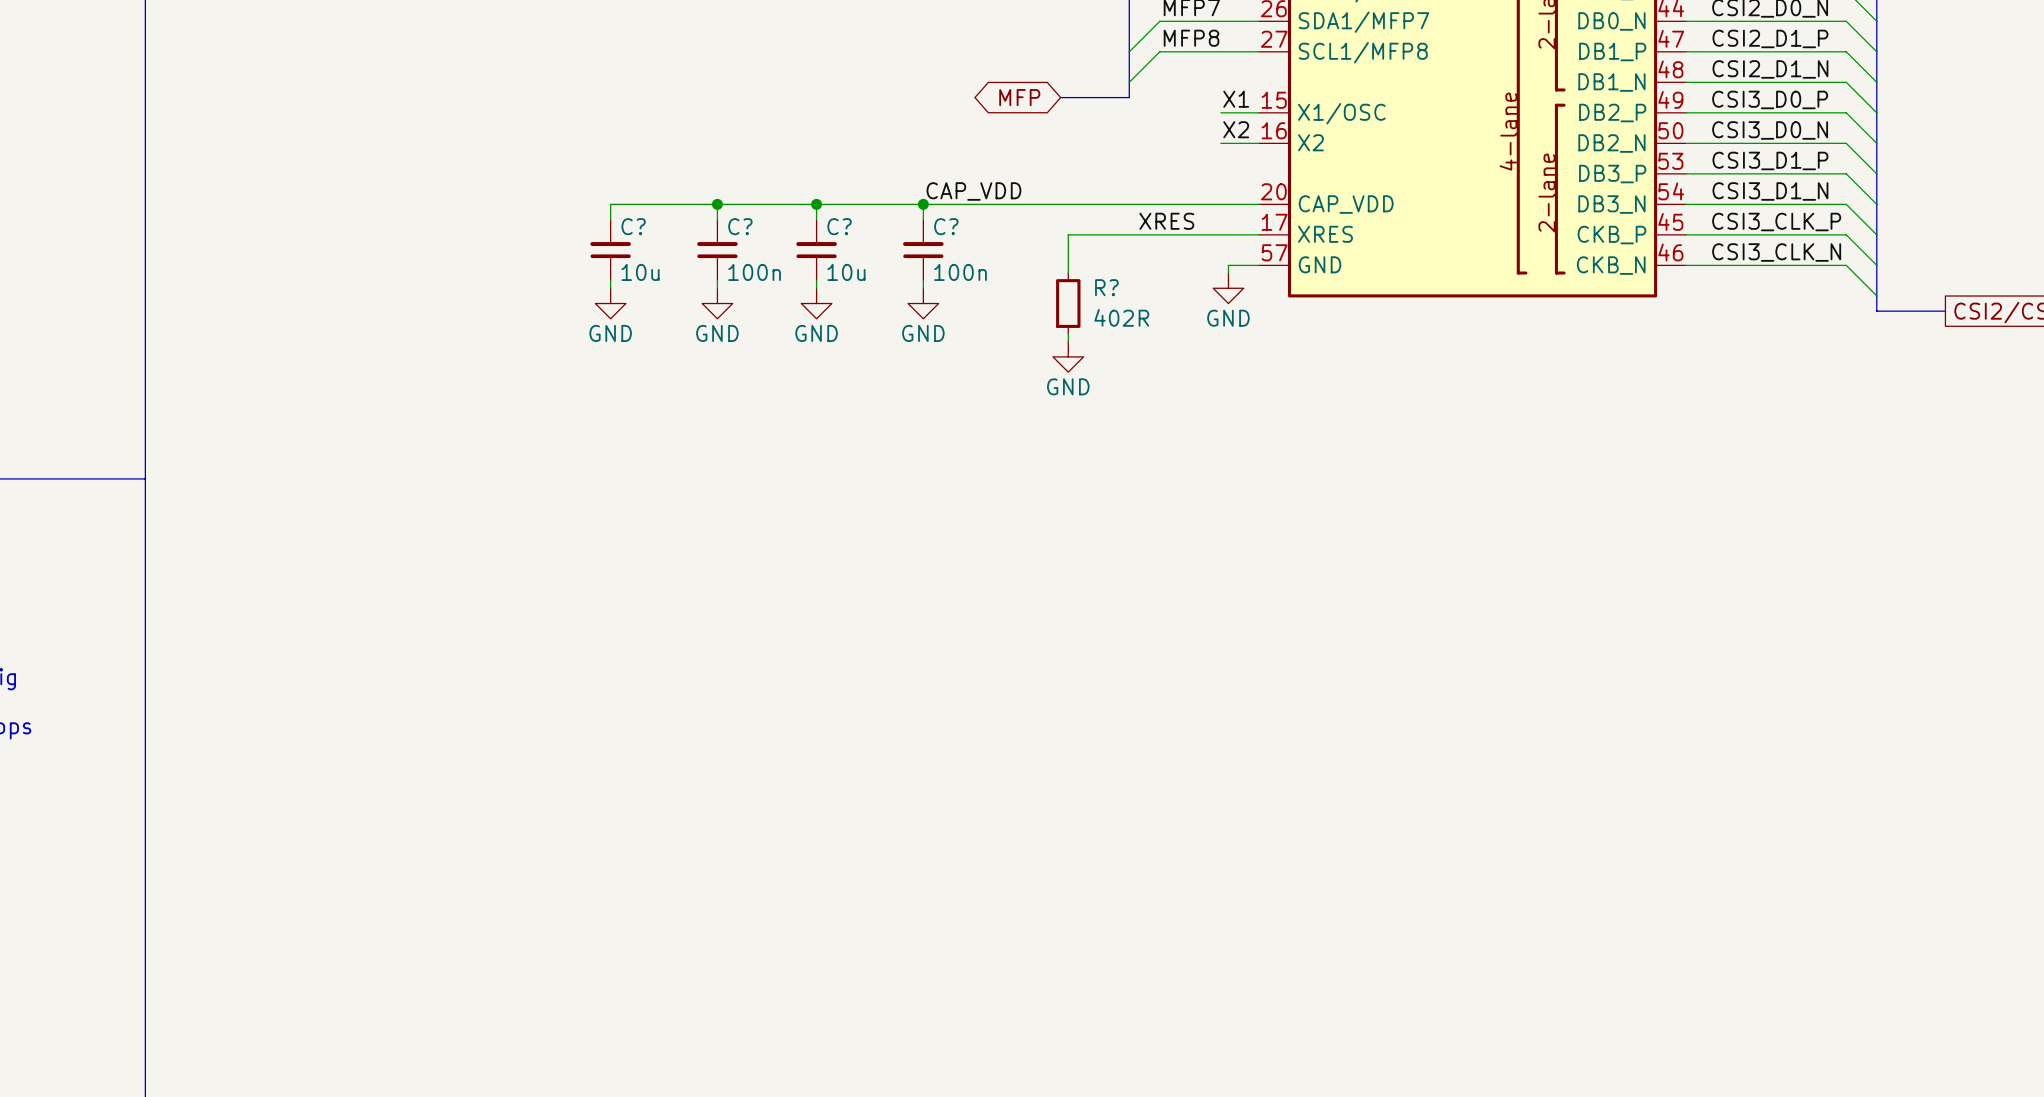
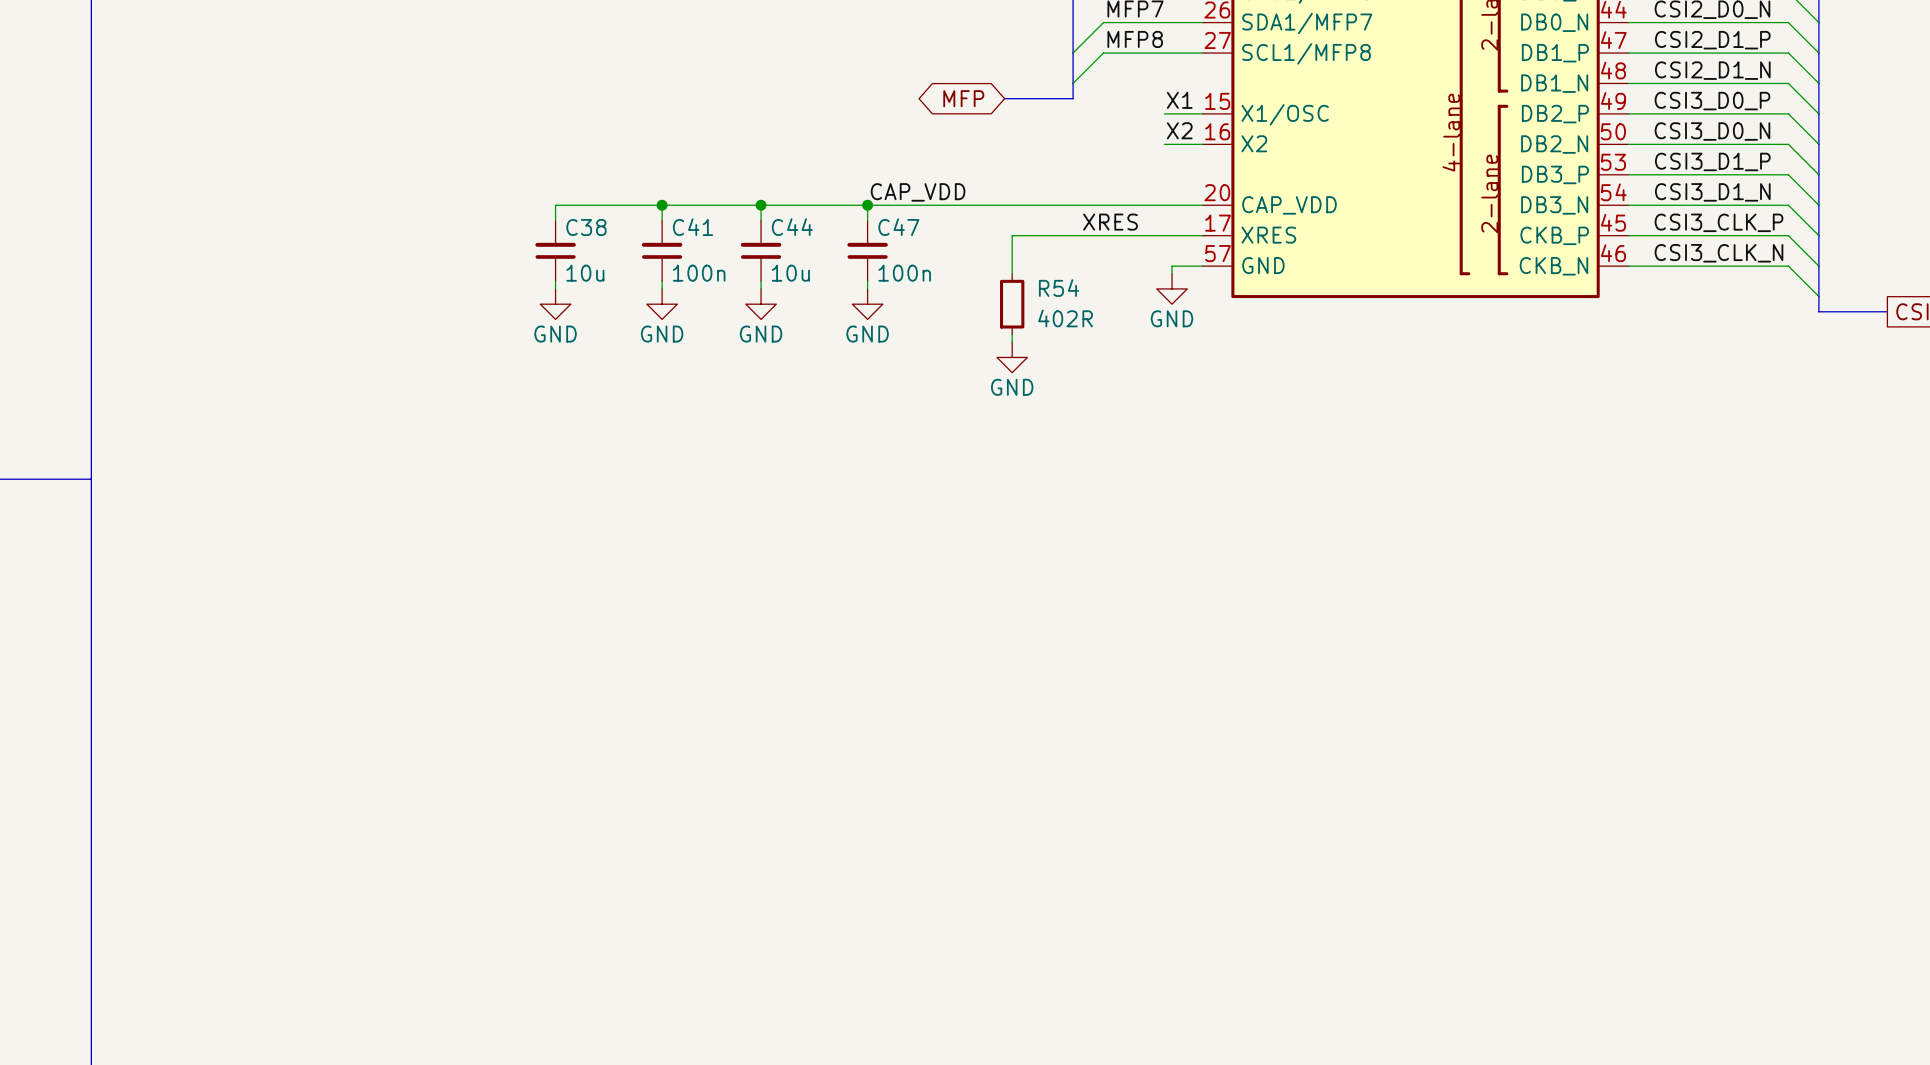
C? name: C? (633, 226) -> C38 (586, 227)
C? name: C? (740, 226) -> C41 (693, 227)
C? name: C? (839, 226) -> C44 (792, 227)
C? name: C? (946, 226) -> C47 (898, 227)
R? name: R? (1106, 287) -> R54 (1059, 288)

